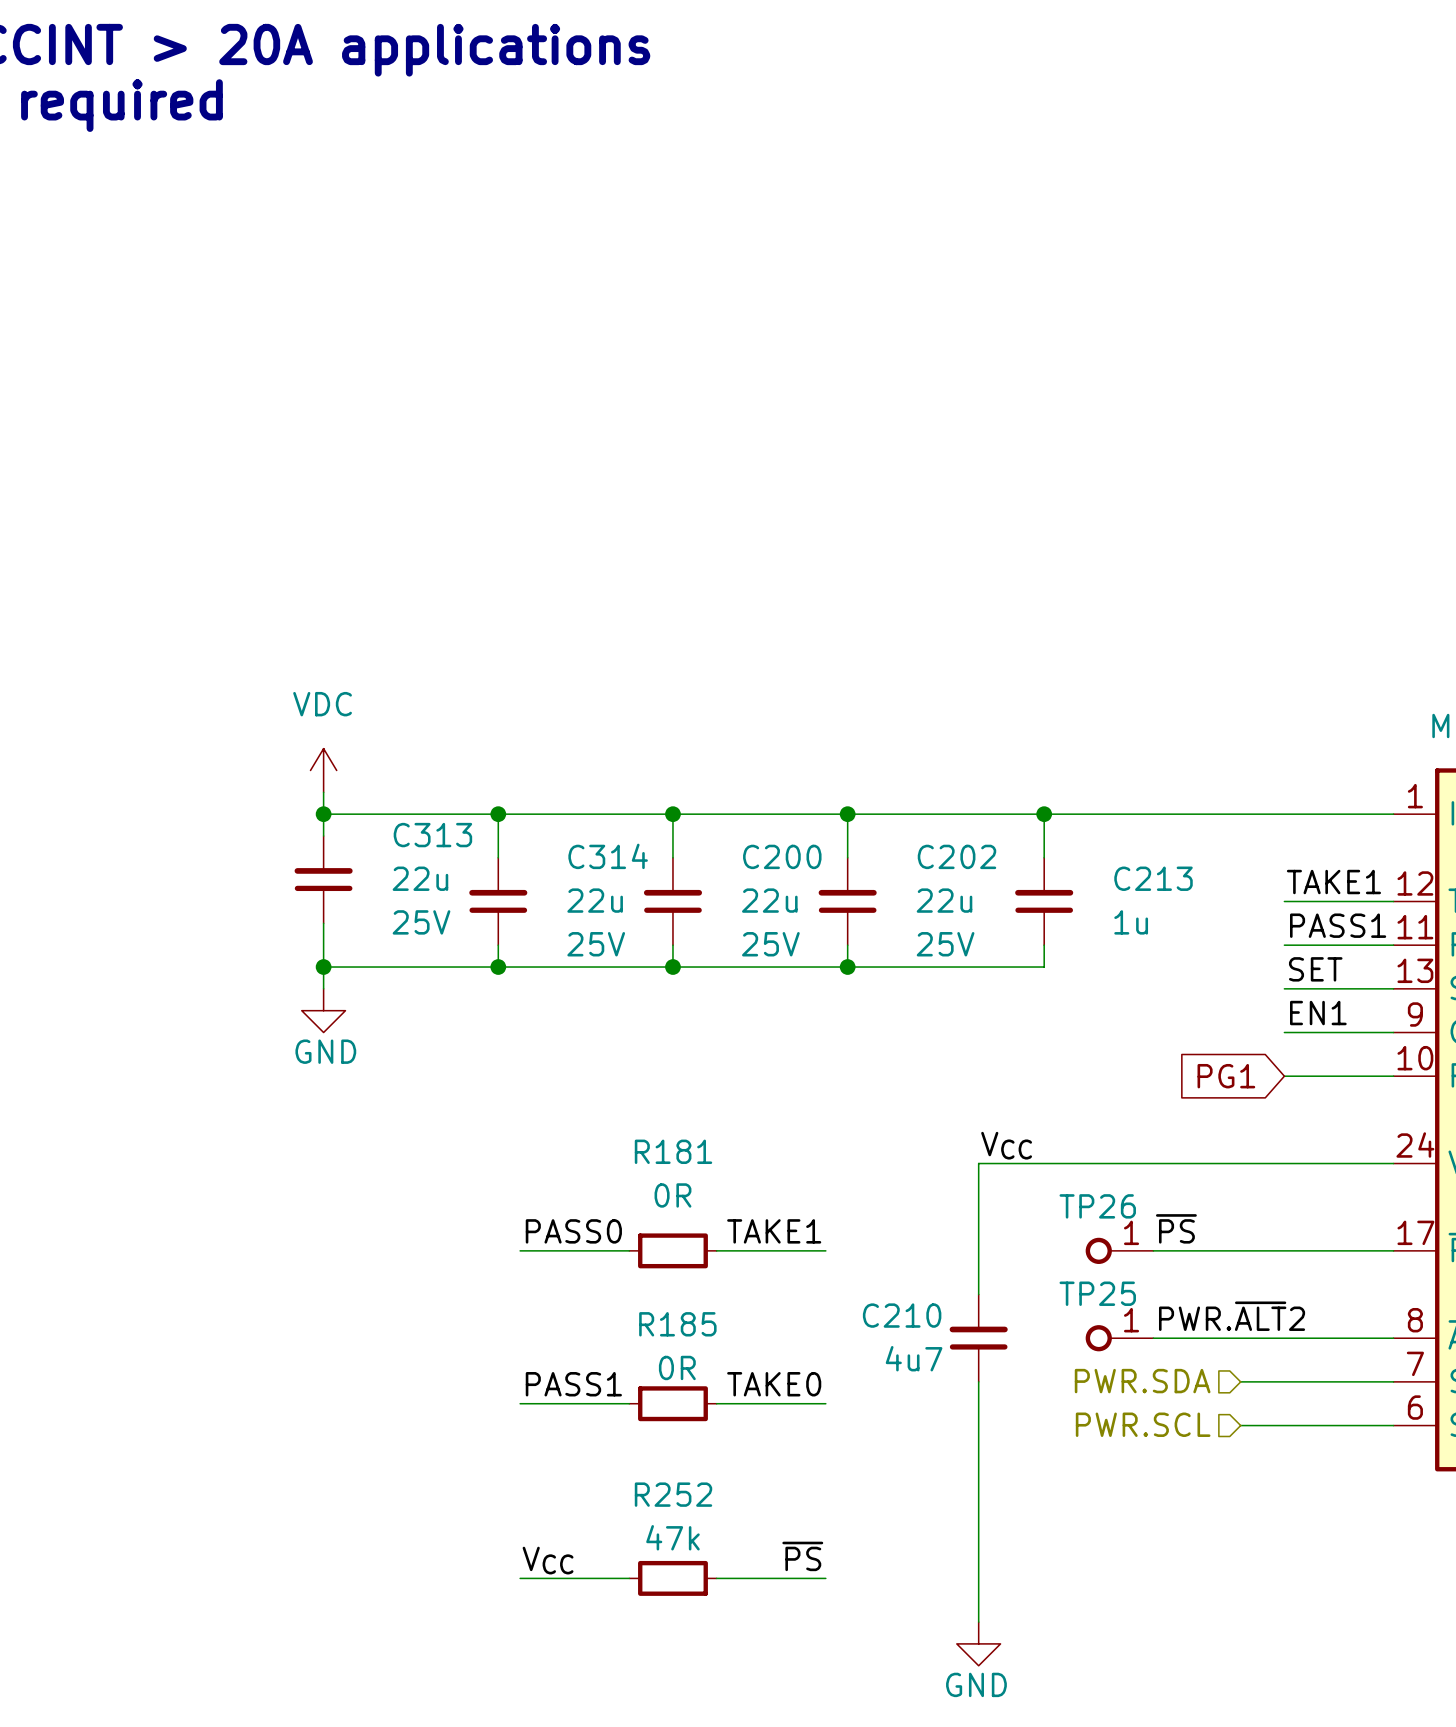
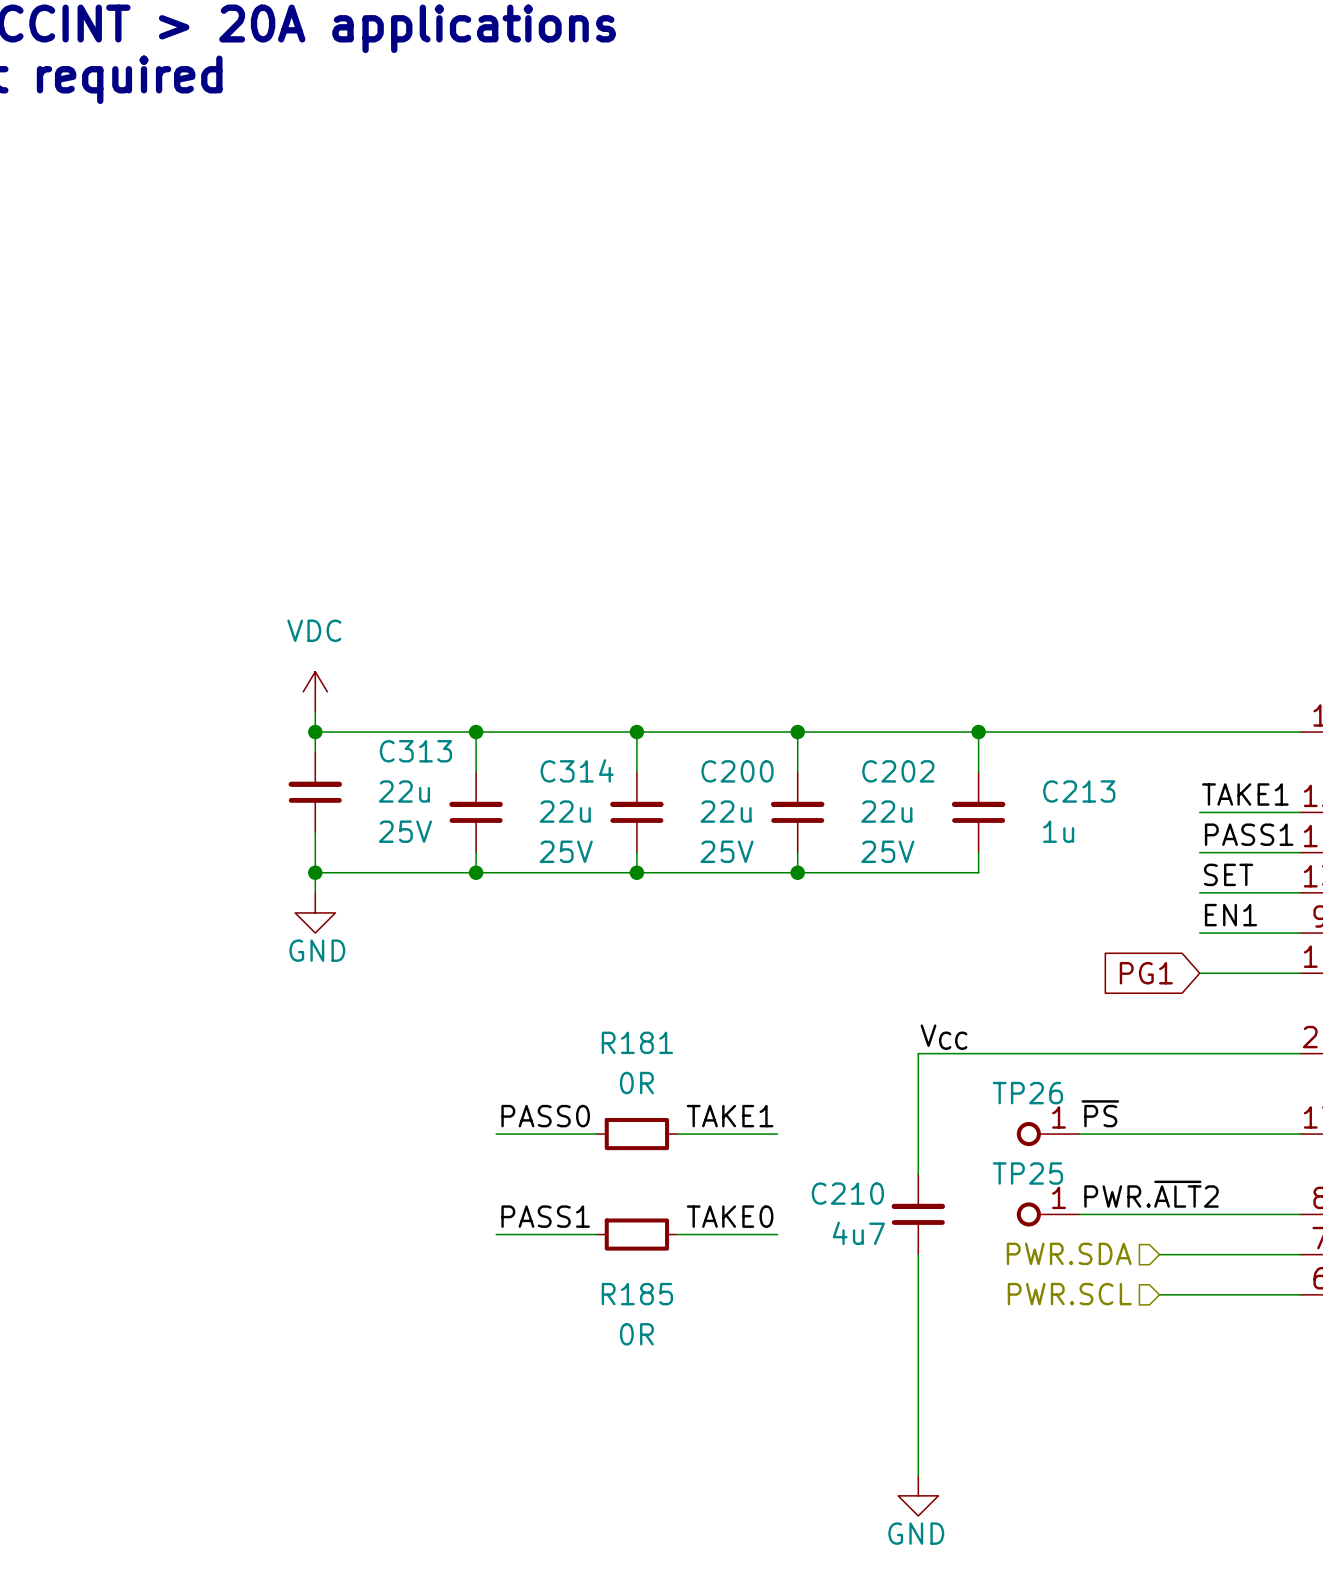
R185 name position: R185 (677, 1324) -> R185 (637, 1294)
R185 text position: 0R (677, 1367) -> 0R (636, 1334)
label position: PASS1 (573, 1384) -> PASS1 (545, 1216)
label position: TAKE0 (774, 1384) -> TAKE0 (730, 1216)
wire: (520, 1403) (629, 1403) -> (496, 1234) (596, 1234)
R185 position: (672, 1403) -> (636, 1234)
wire: (716, 1403) (825, 1403) -> (677, 1234) (777, 1234)
label: ~{PS} (802, 1556) -> none
label: VCC (548, 1560) -> none
wire: (520, 1578) (629, 1578) -> none
R252: (672, 1578) -> none
wire: (716, 1578) (825, 1578) -> none

